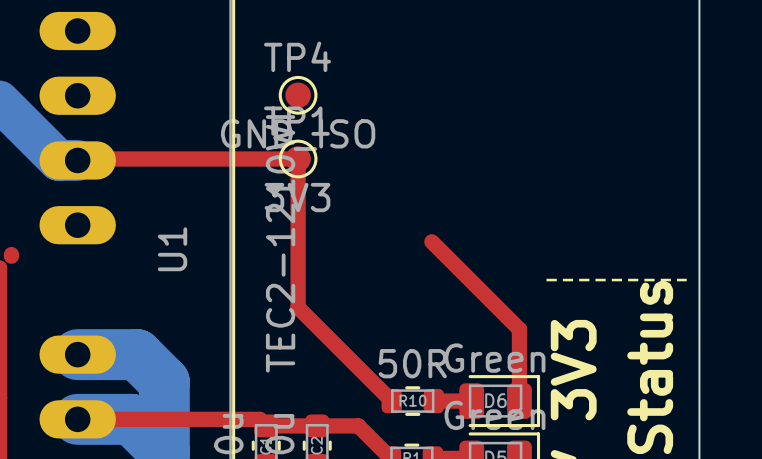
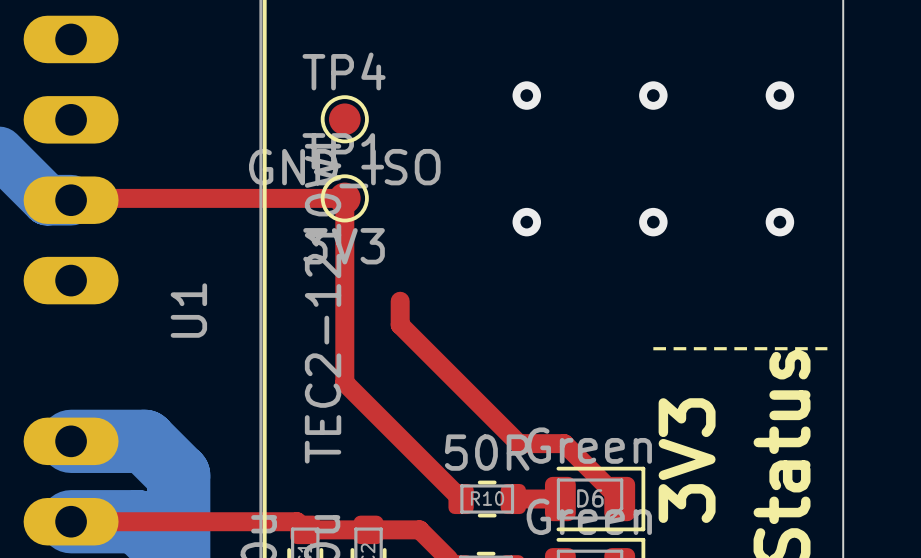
via: none -> (526, 95)
via: none -> (653, 95)
via: none -> (779, 95)
via: none -> (526, 222)
via: none -> (653, 222)
via: none -> (779, 222)
top track: (431, 241) (519, 329) (519, 401) -> (400, 301) (400, 324) (518, 443) (564, 443) (619, 499)

